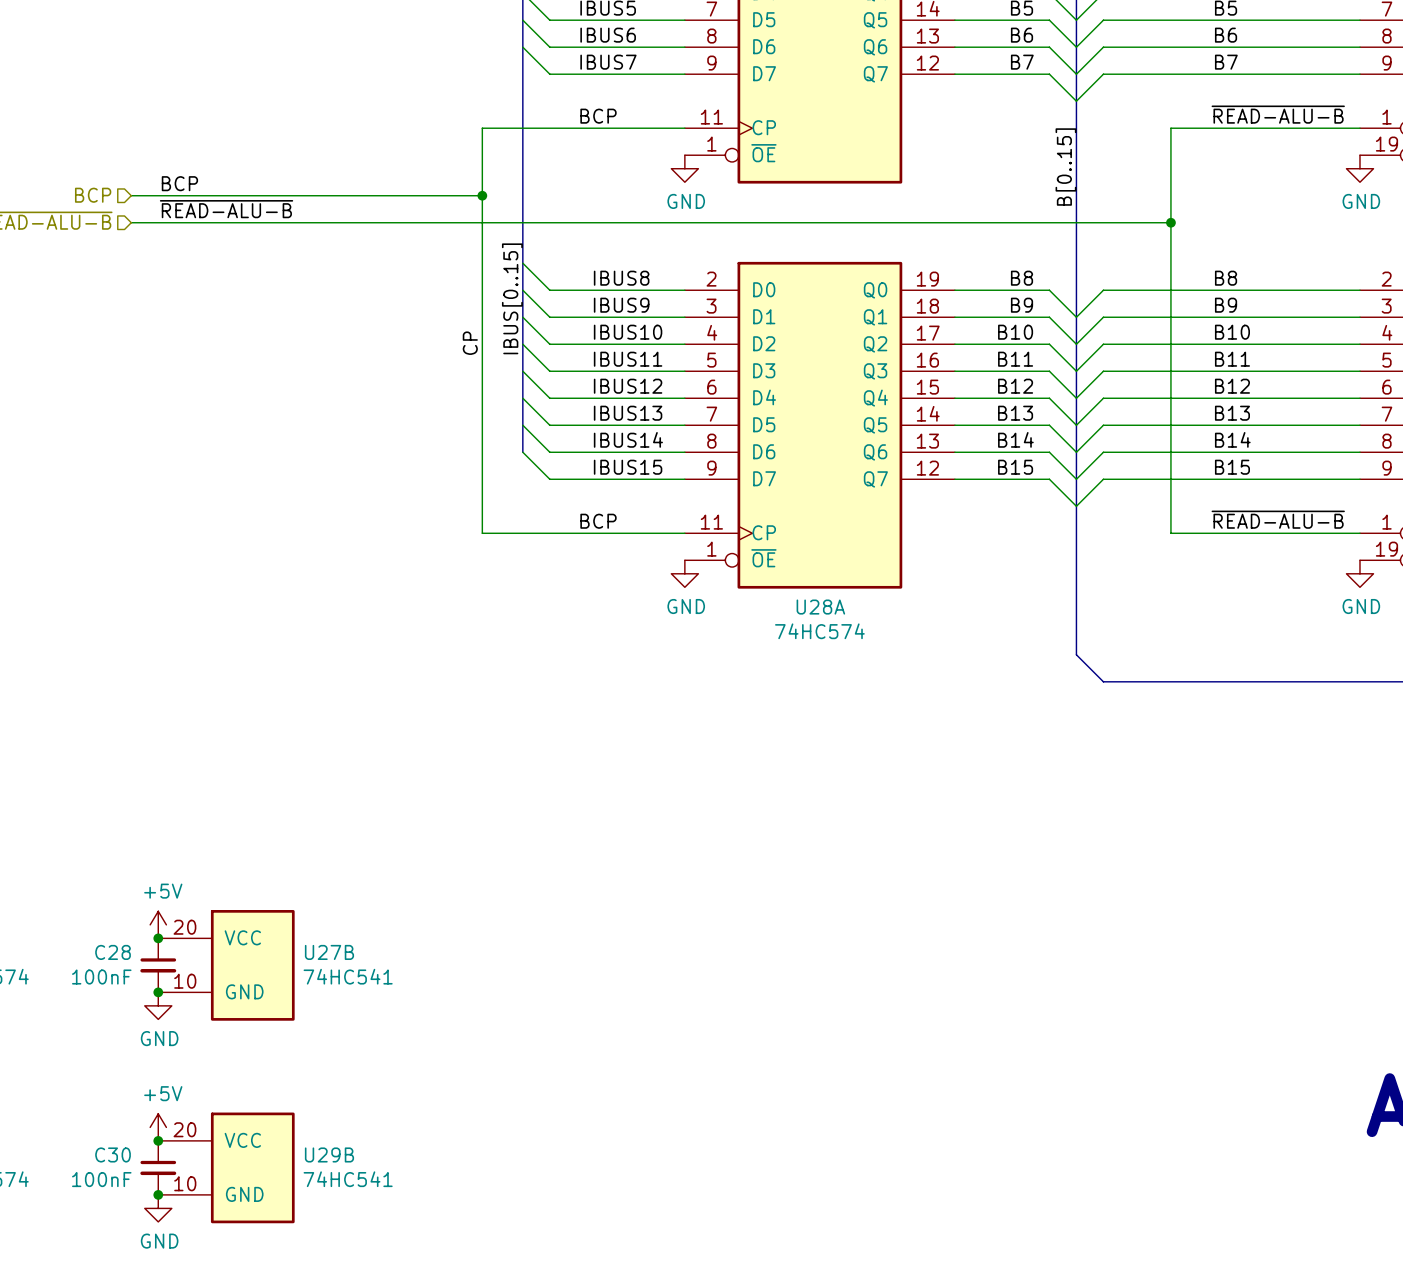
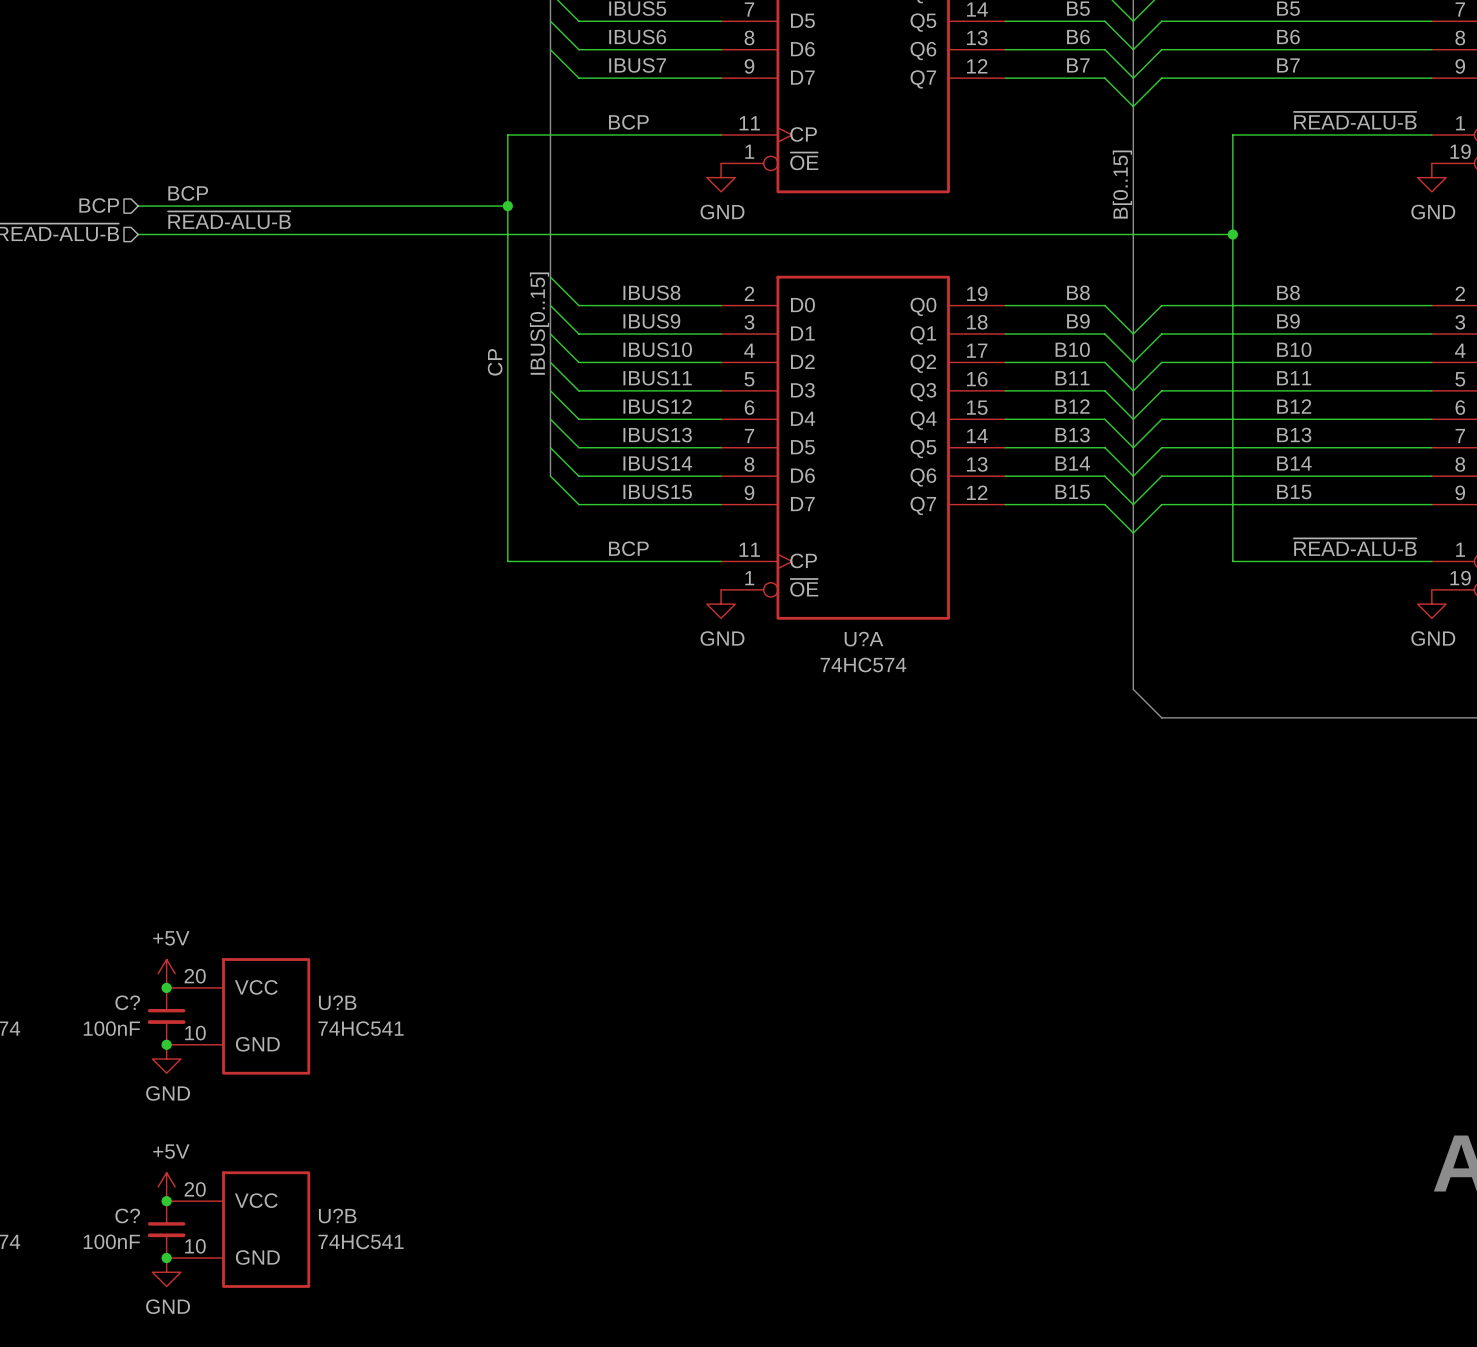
U28A name: U28A (820, 607) -> U?A (863, 639)
C28 name: C28 (113, 952) -> C? (127, 1002)
U27B name: U27B (329, 952) -> U?B (337, 1002)
C30 name: C30 (113, 1154) -> C? (127, 1215)
U29B name: U29B (329, 1154) -> U?B (337, 1215)

